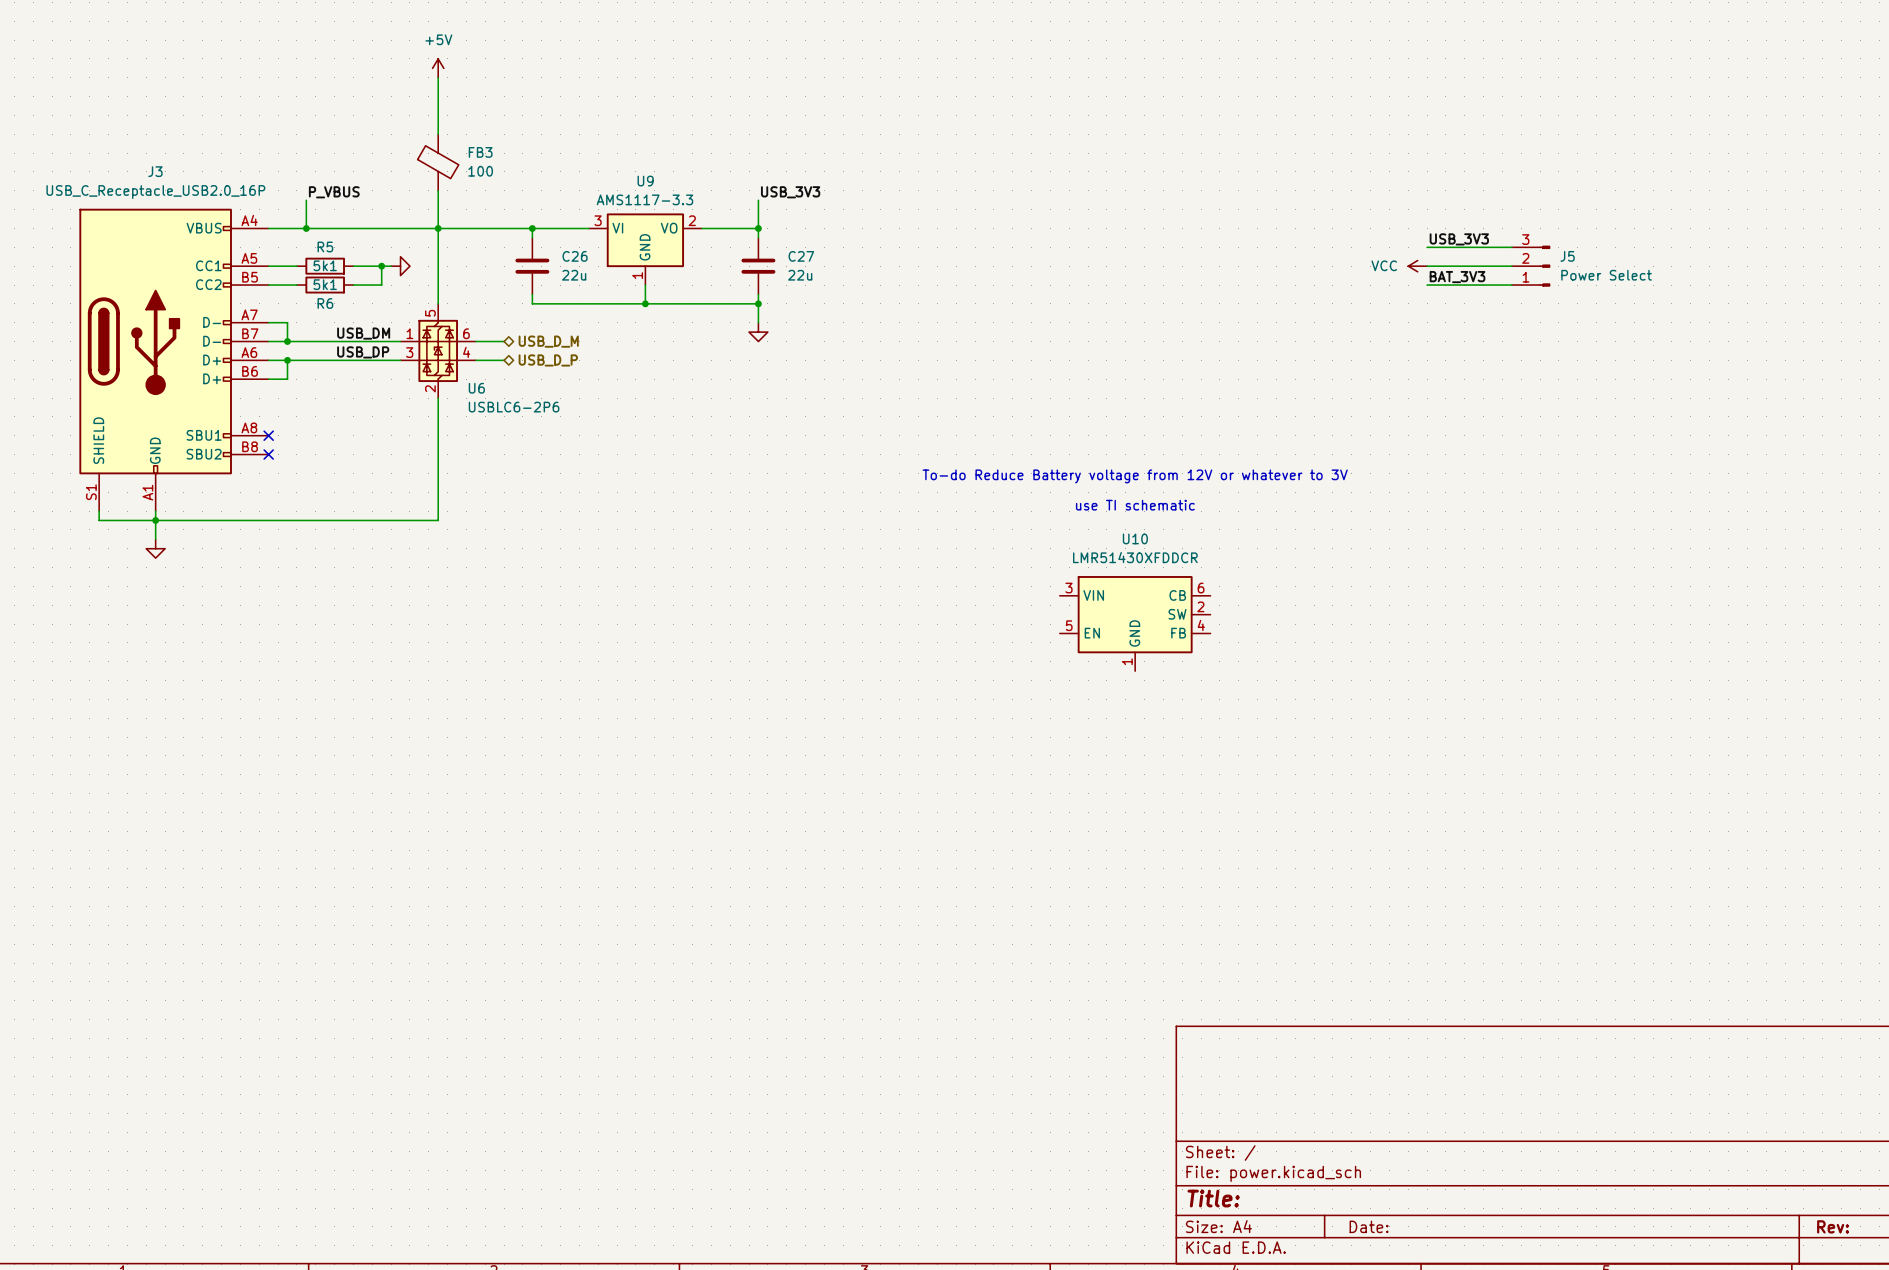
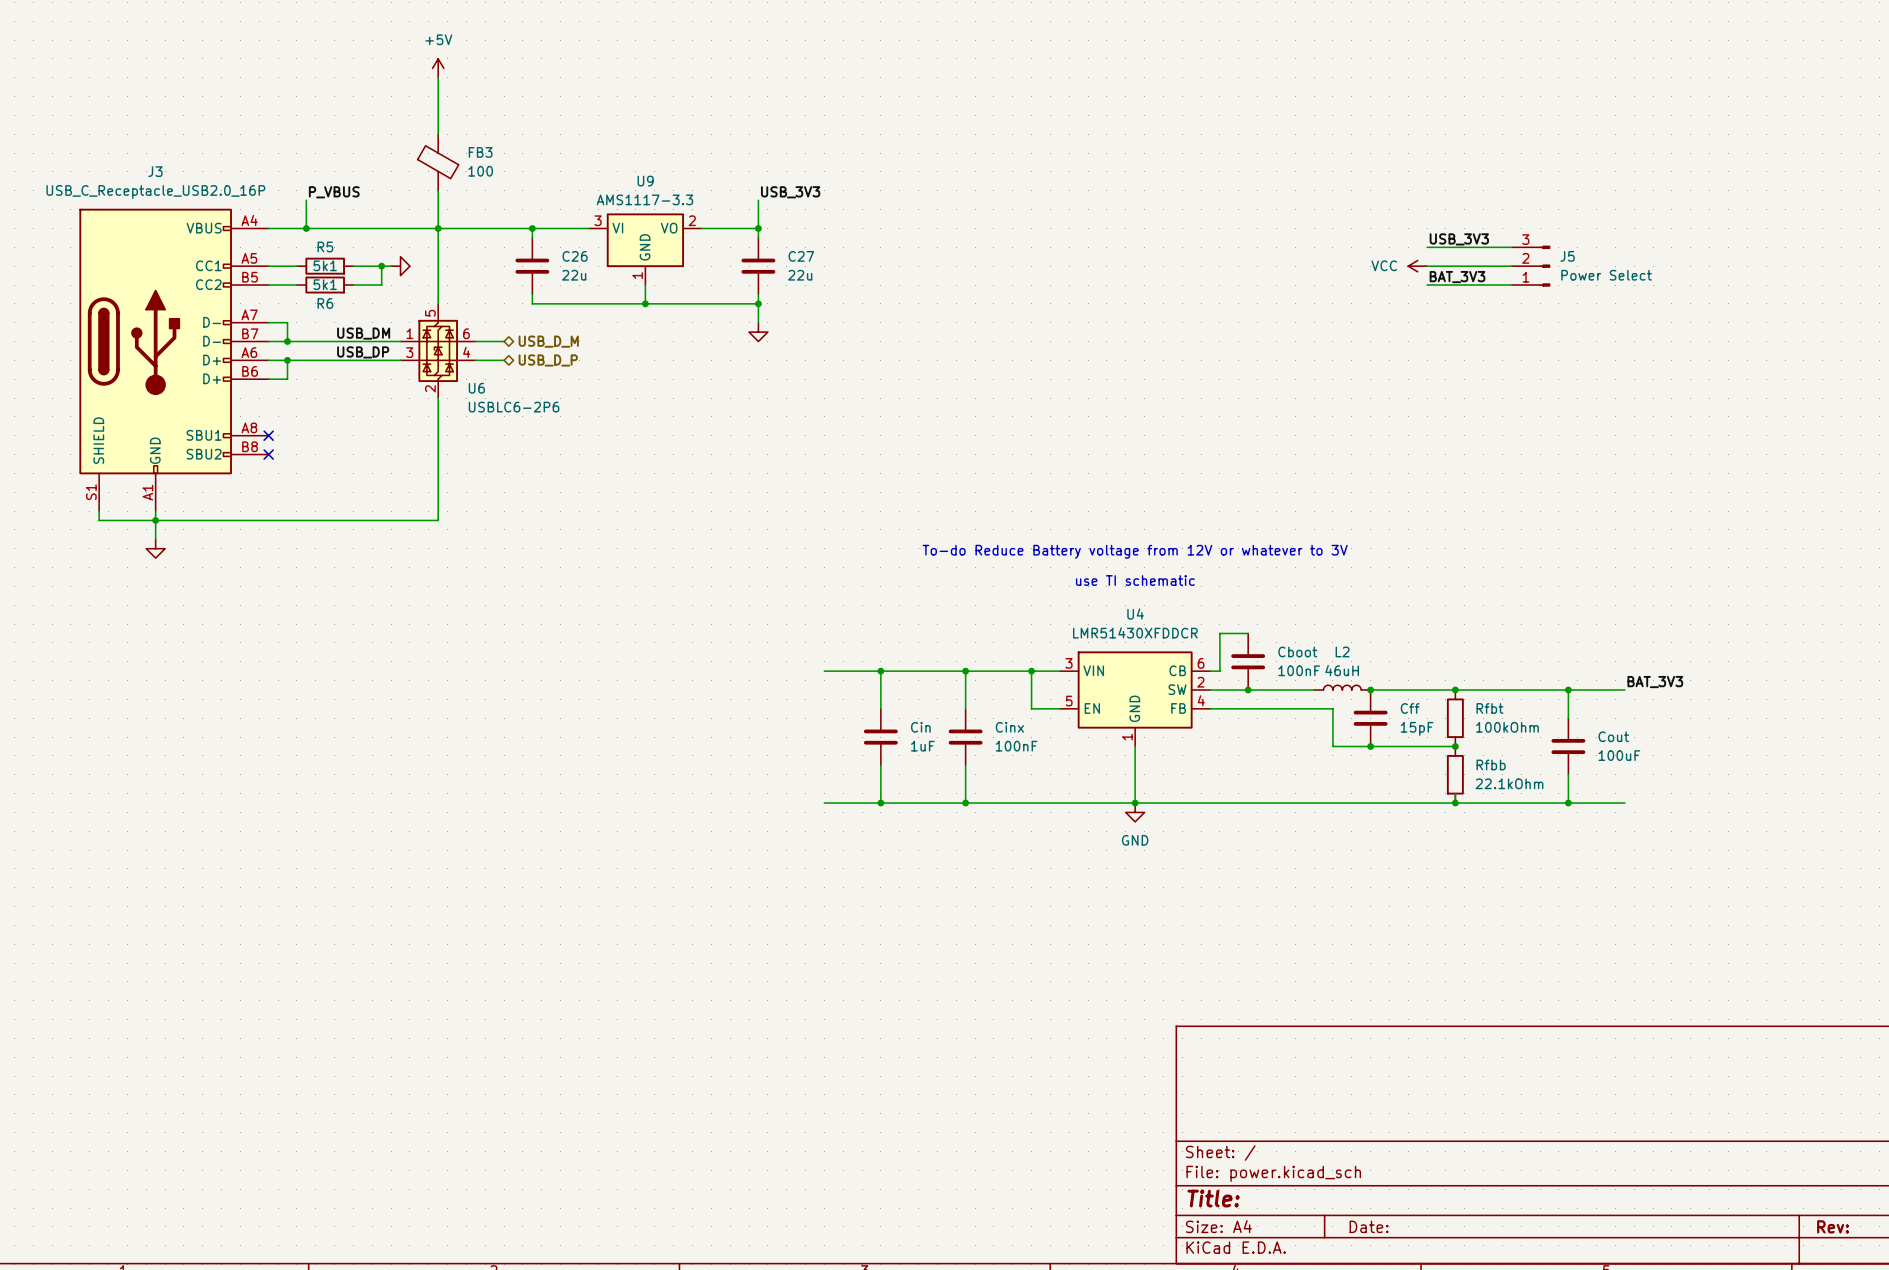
text position: To-do Reduce Battery voltage from 12V or whatever to 3V (1135, 476) -> To-do Reduce Battery voltage from 12V or whatever to 3V (1135, 551)
text position: use TI schematic (1135, 505) -> use TI schematic (1135, 580)
U10: LMR51430XFDDCR (1135, 623) -> none
wire: none -> (1248, 633) (1219, 633) (1219, 671) (1210, 671)
Cboot: none -> 100nF (1248, 661)
wire: none -> (824, 671) (1059, 671)
wire: none -> (880, 671) (880, 708)
junction: none -> (880, 671)
wire: none -> (965, 671) (965, 708)
junction: none -> (965, 671)
wire: none -> (1031, 671) (1031, 708) (1059, 708)
junction: none -> (1031, 671)
label: none -> BAT_3V3 (1655, 682)
L2: none -> 46uH (1342, 687)
wire: none -> (1210, 689) (1314, 689)
junction: none -> (1248, 689)
wire: none -> (1370, 689) (1624, 689)
junction: none -> (1370, 689)
junction: none -> (1455, 689)
wire: none -> (1568, 689) (1568, 718)
junction: none -> (1568, 689)
U4: none -> LMR51430XFDDCR (1135, 698)
wire: none -> (1210, 708) (1332, 708) (1332, 746) (1455, 746)
Cff: none -> 15pF (1370, 718)
Rfbt: none -> 100kOhm (1455, 718)
Cin: none -> 1uF (880, 737)
Cinx: none -> 100nF (965, 737)
wire: none -> (1135, 746) (1135, 803)
junction: none -> (1370, 746)
junction: none -> (1455, 746)
Cout: none -> 100uF (1568, 746)
wire: none -> (880, 765) (880, 803)
wire: none -> (965, 765) (965, 803)
Rfbb: none -> 22.1kOhm (1455, 774)
wire: none -> (1568, 774) (1568, 803)
wire: none -> (1455, 793) (1455, 803)
wire: none -> (824, 803) (1624, 803)
junction: none -> (880, 803)
junction: none -> (965, 803)
junction: none -> (1135, 803)
junction: none -> (1455, 803)
junction: none -> (1568, 803)
power symbol: none -> GND (1135, 812)

